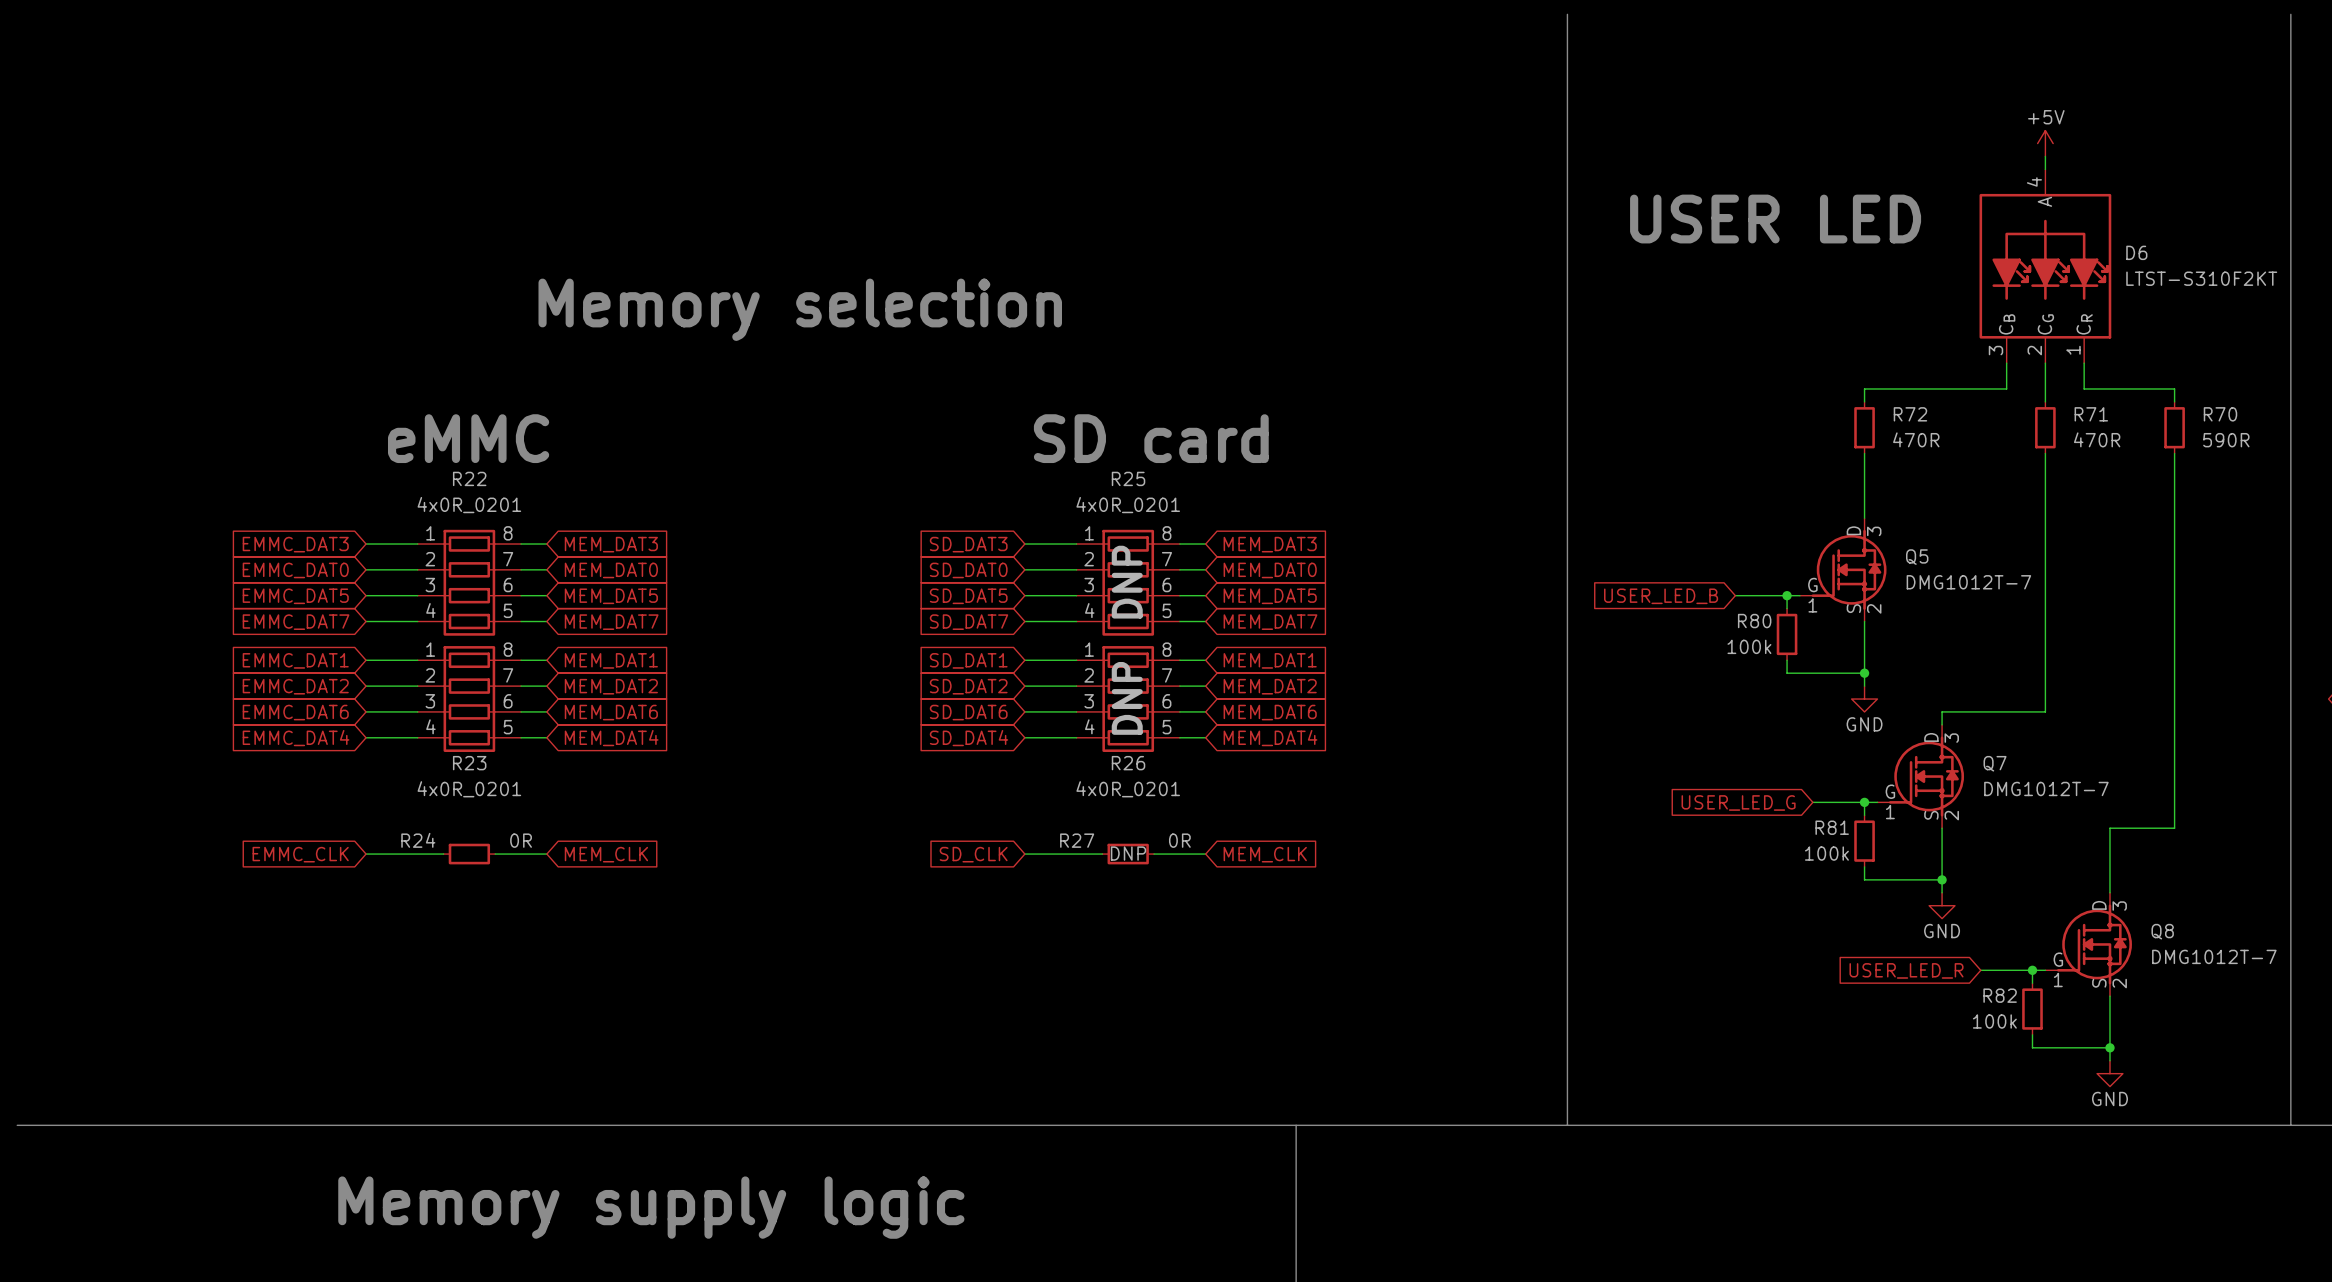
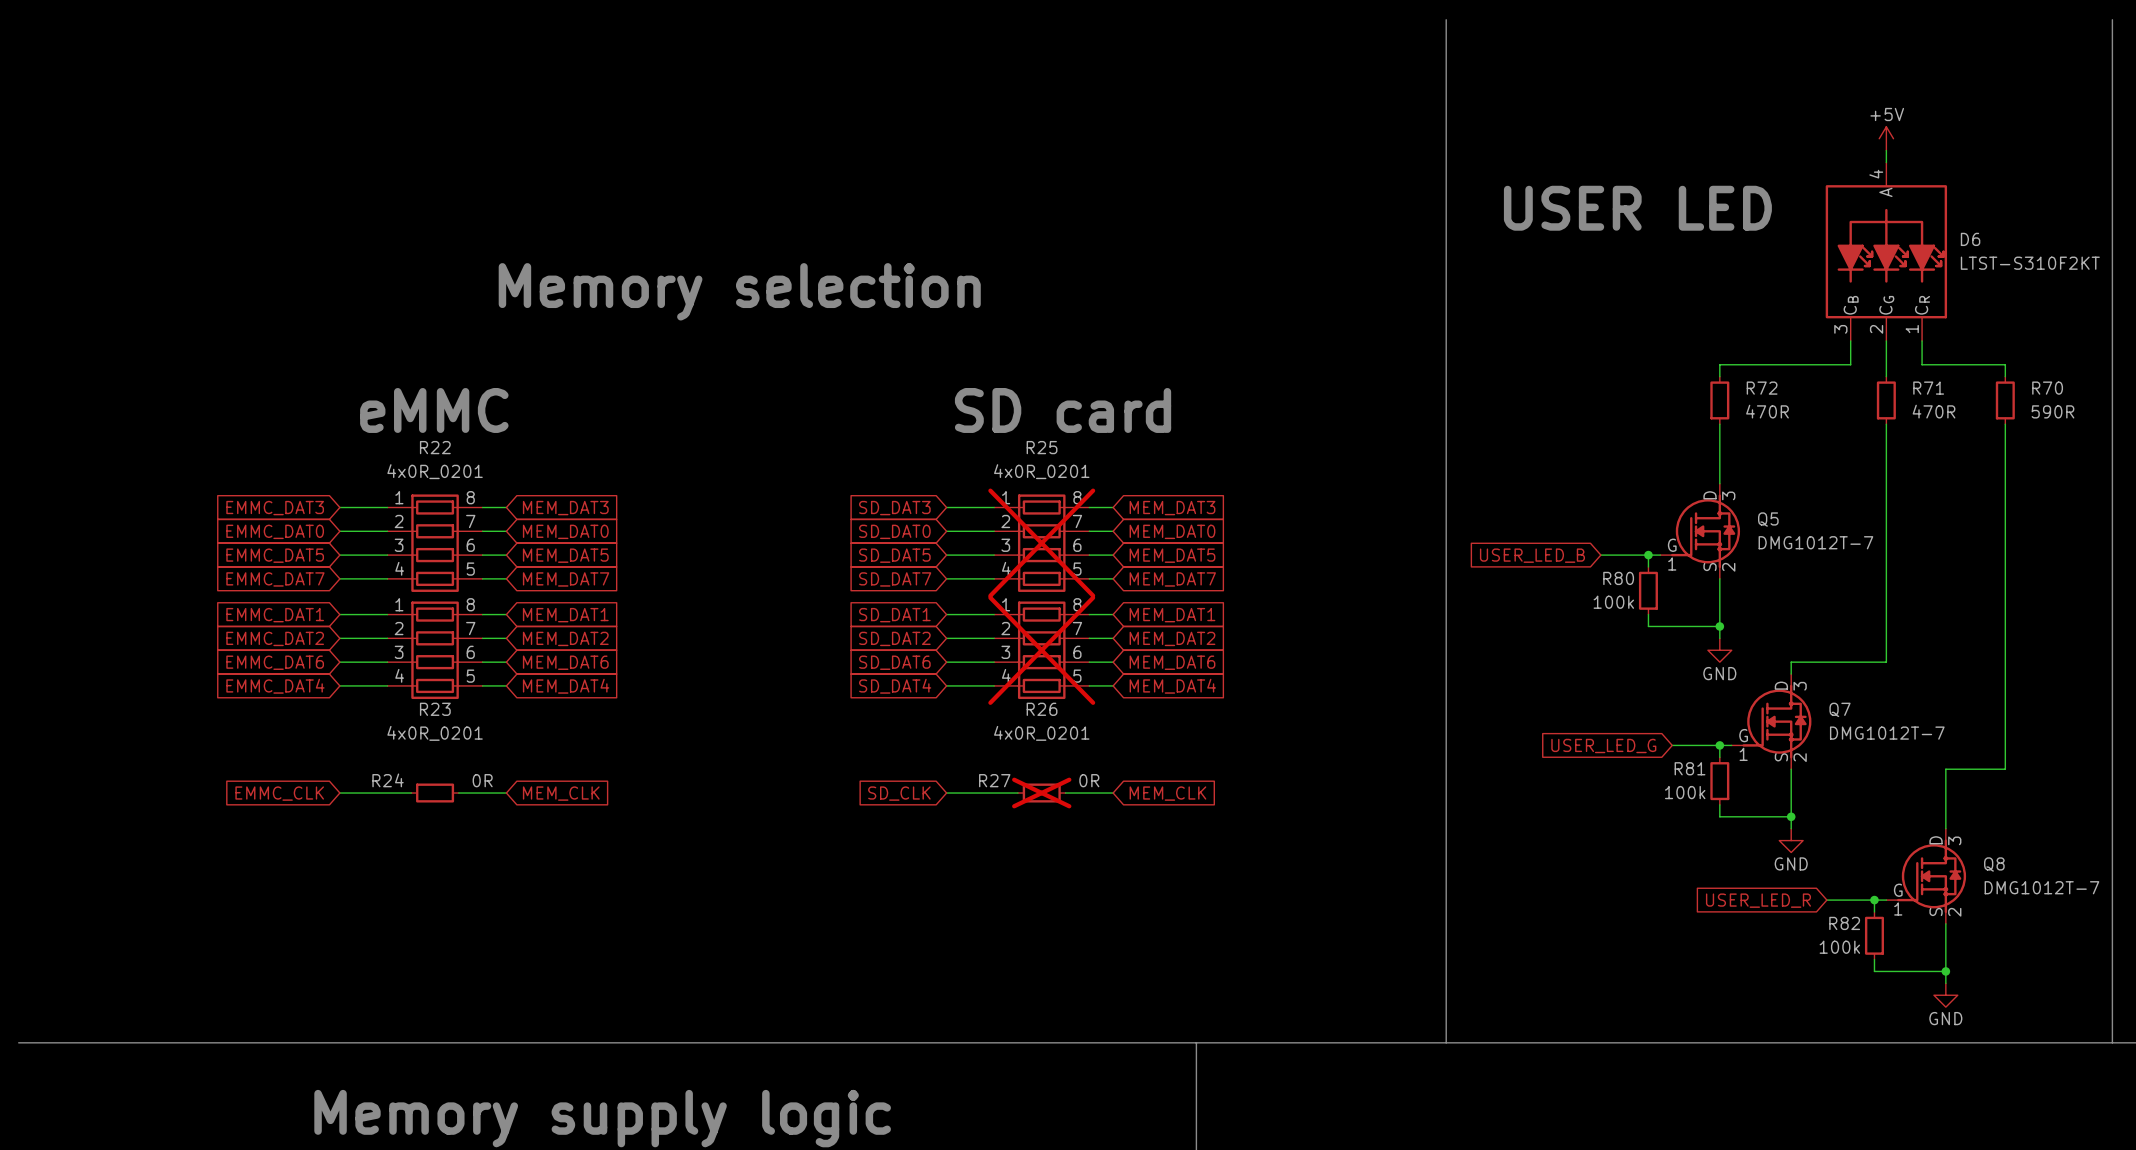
R25 text: DNP (1127, 582) -> none
R25 do-not-place cross: none -> (1041, 543)
R26 text: DNP (1127, 698) -> none
R26 do-not-place cross: none -> (1041, 650)
R27 text: DNP (1128, 853) -> none
R27 do-not-place cross: none -> (1041, 793)

